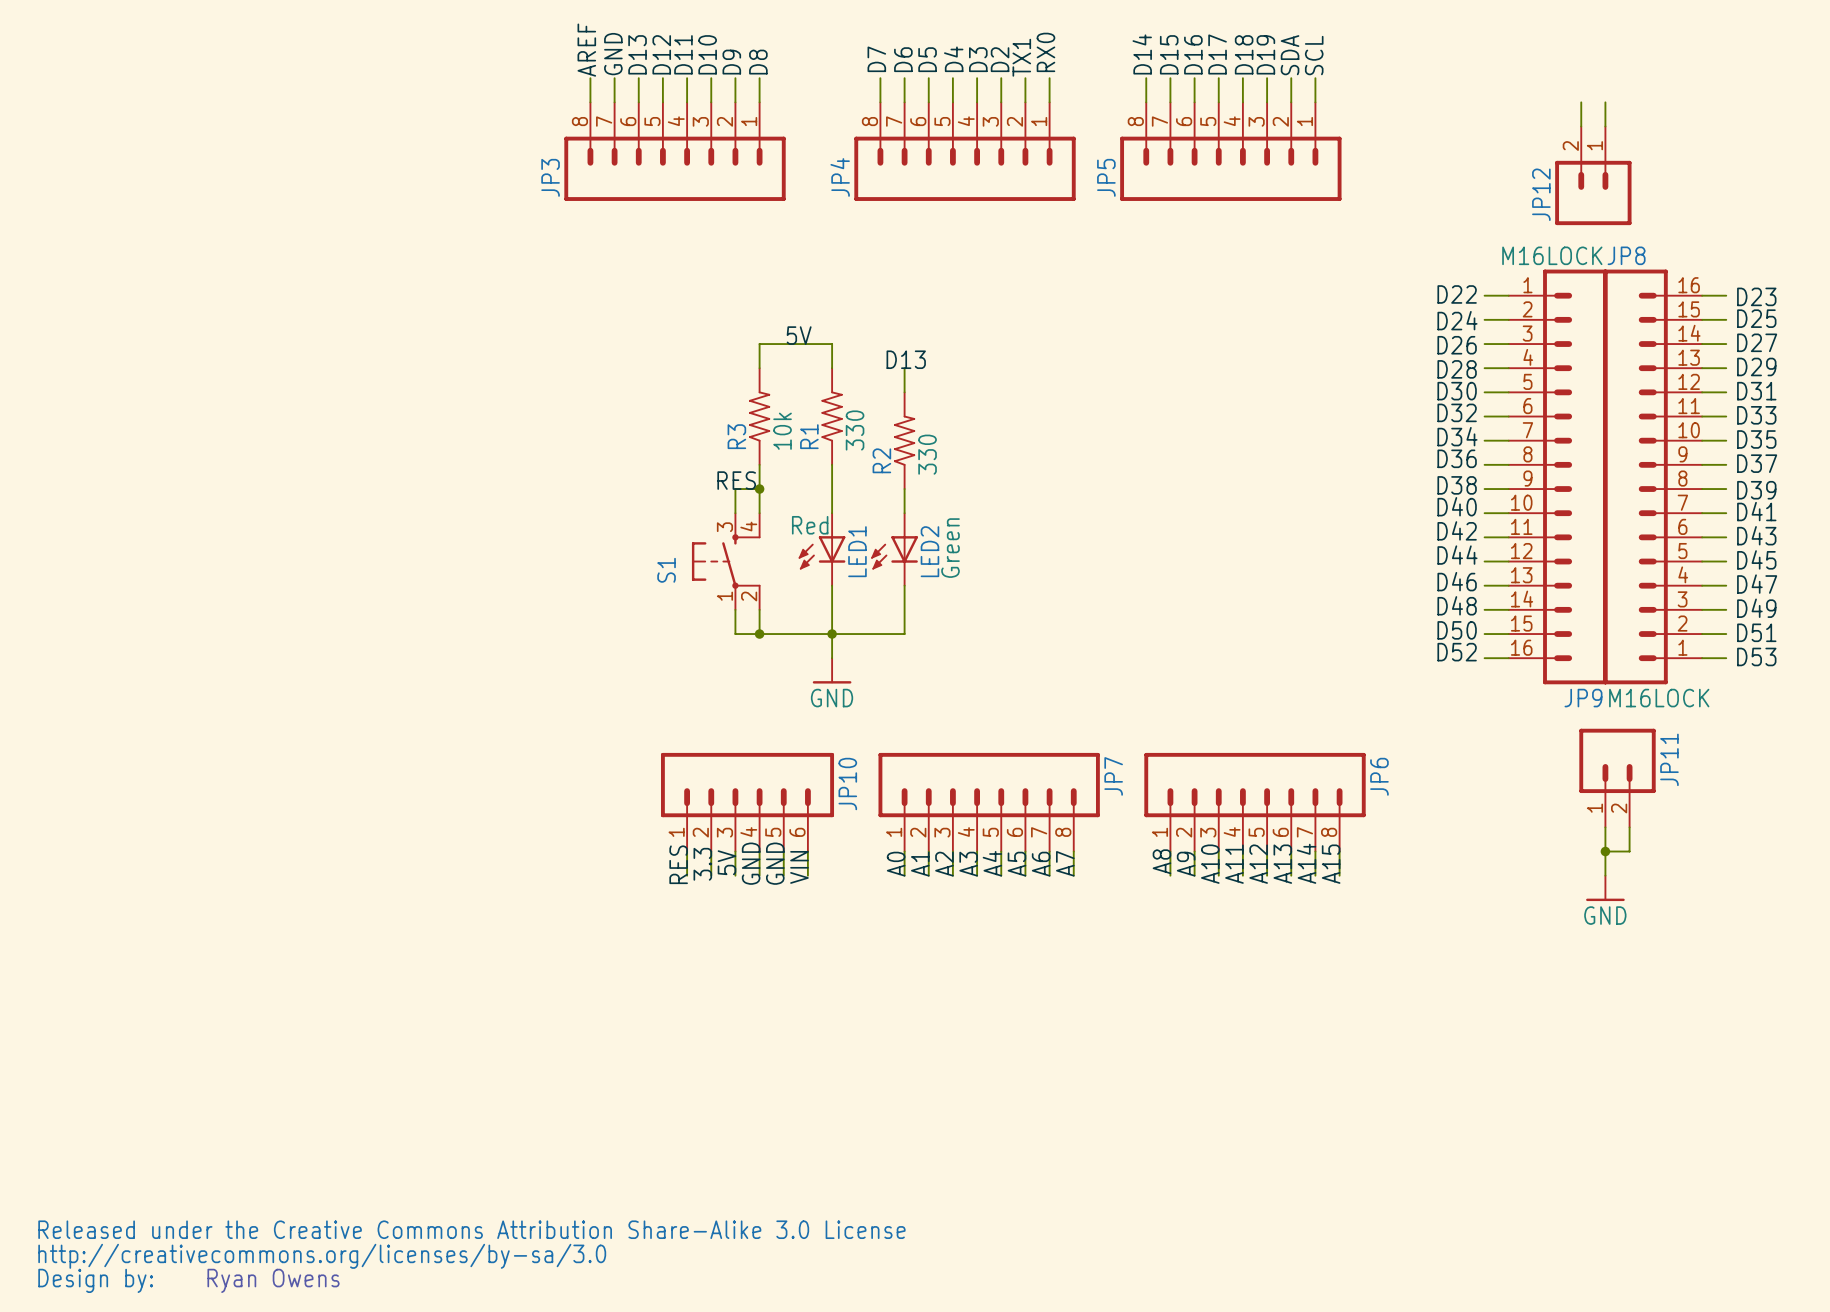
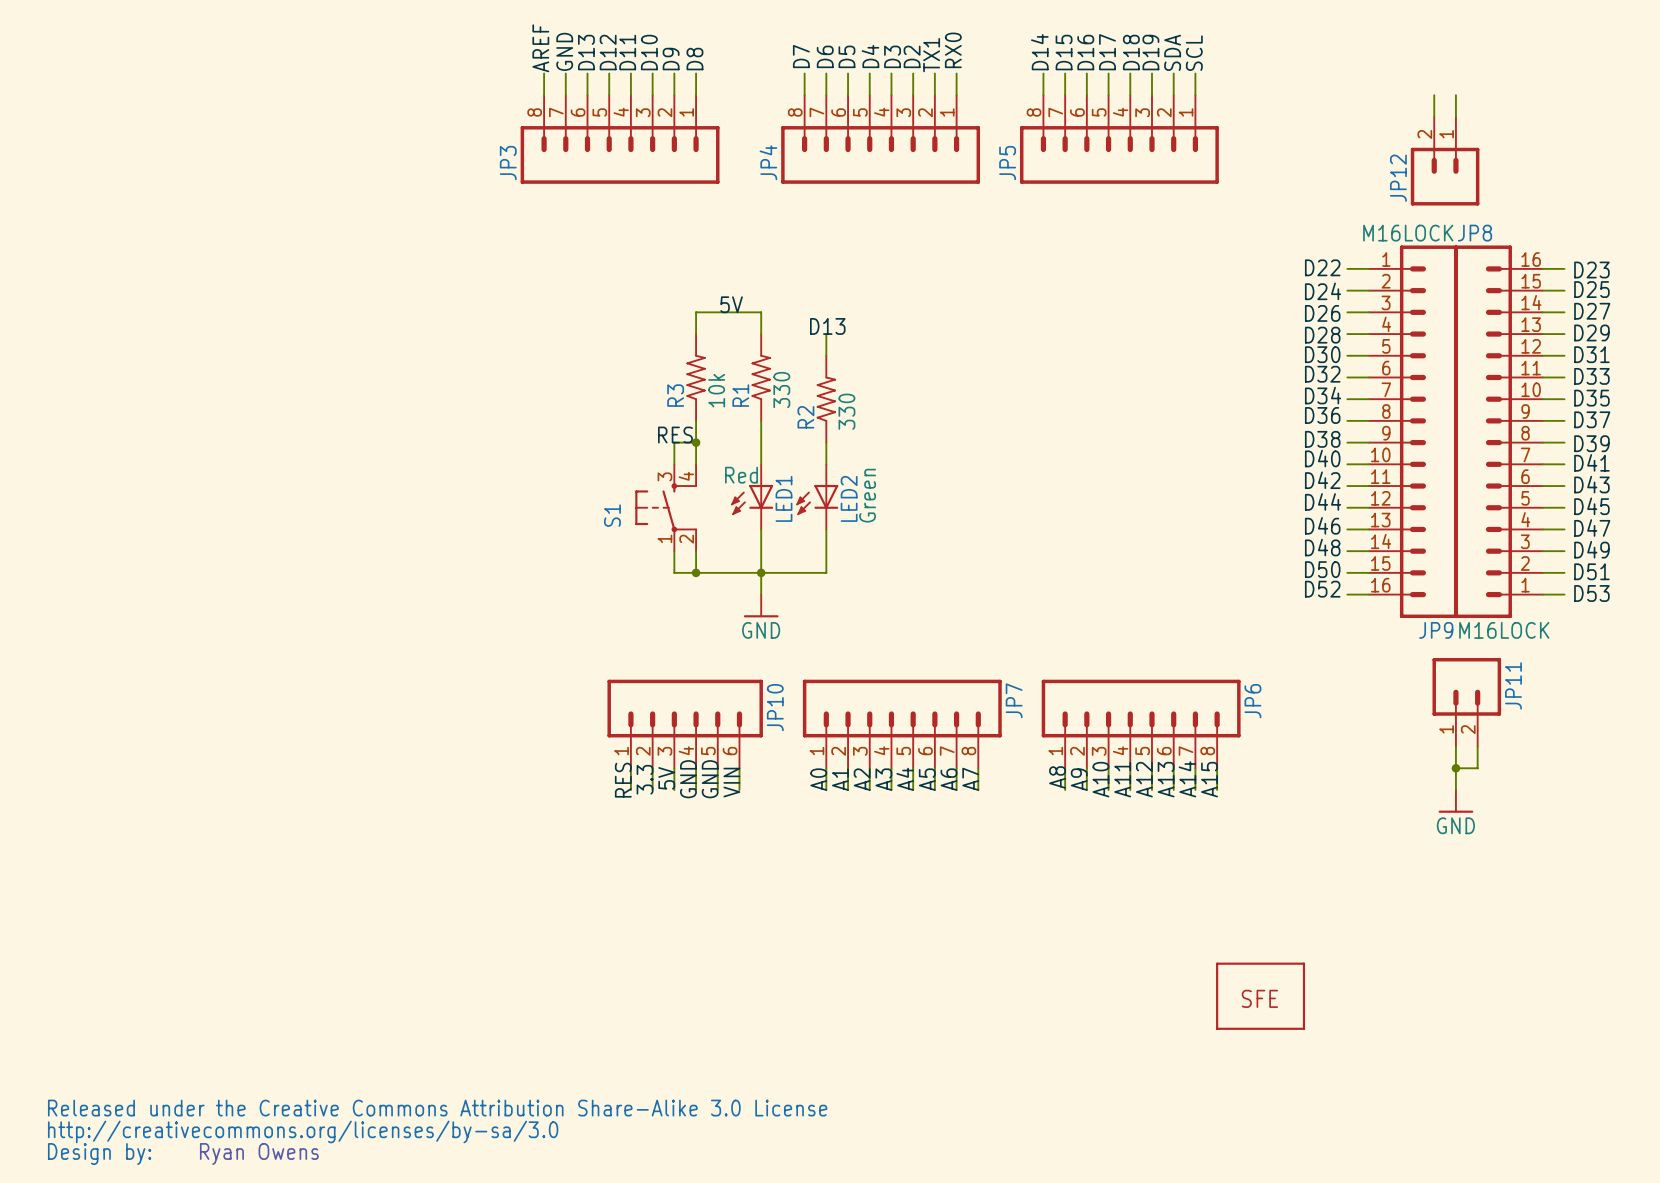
part: none -> (1260, 996)

